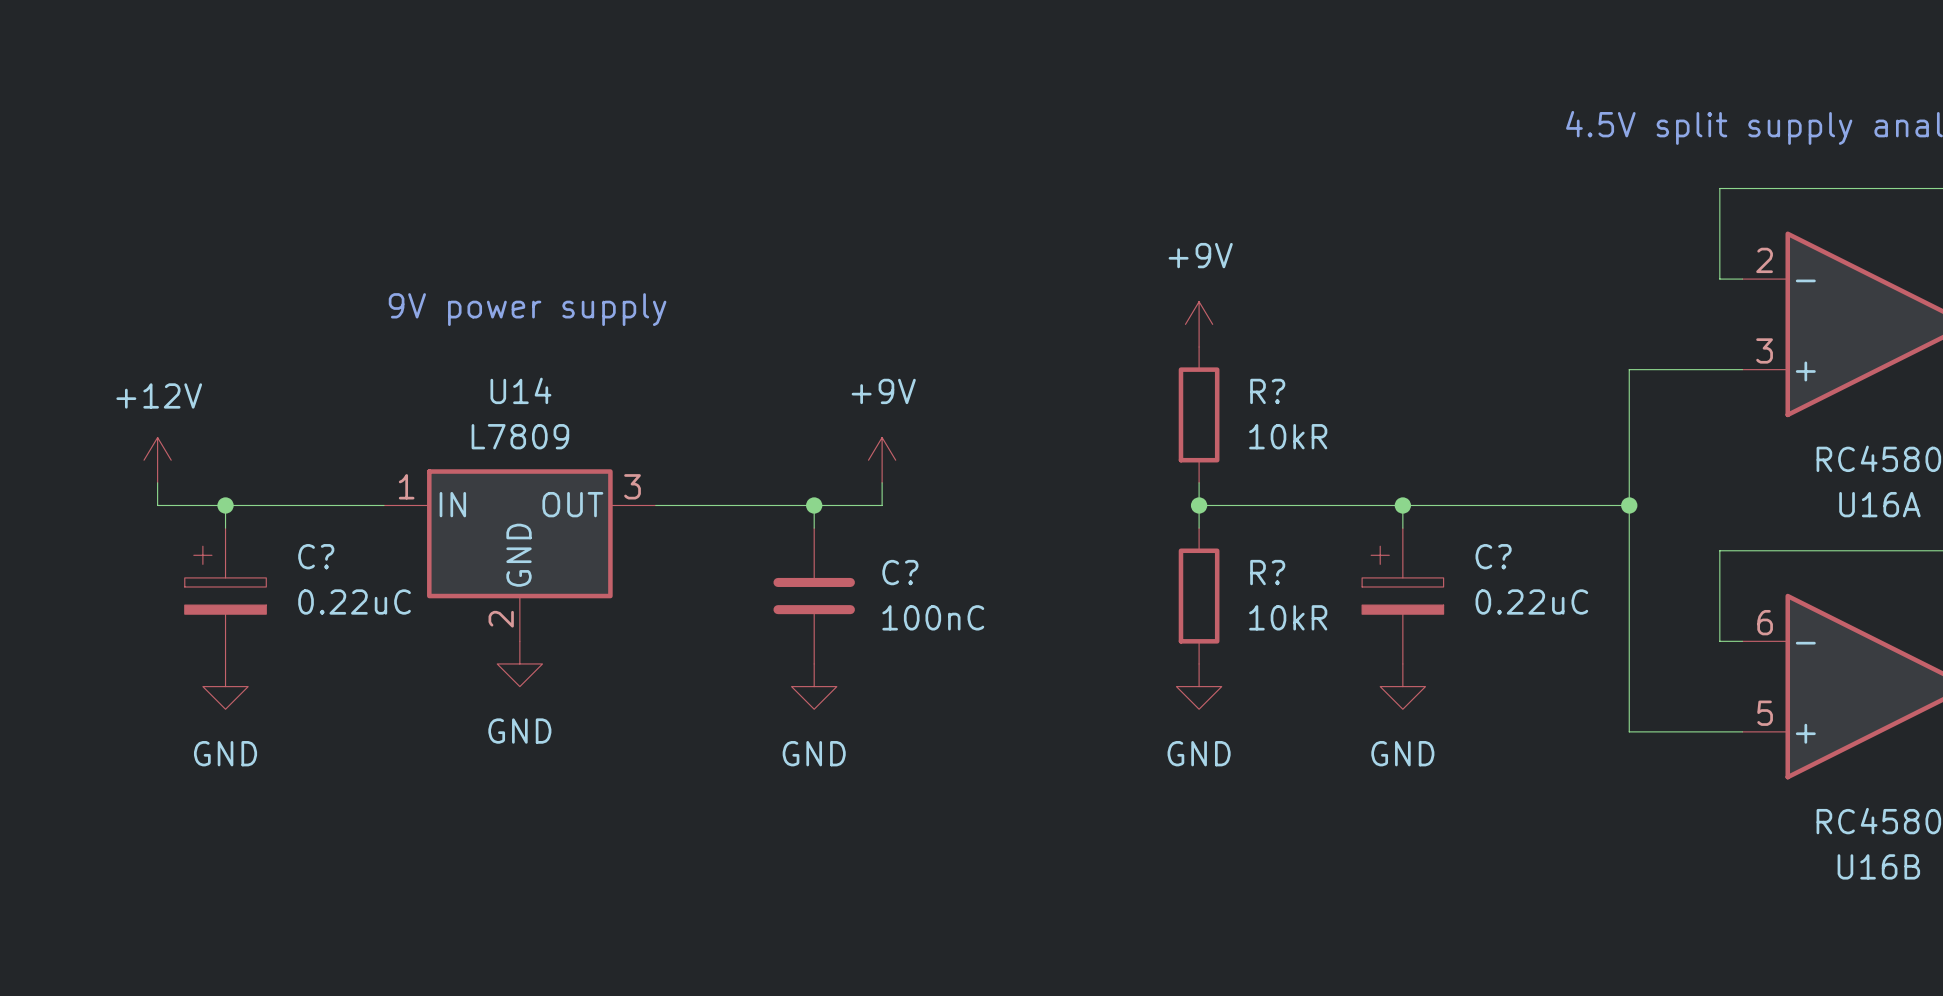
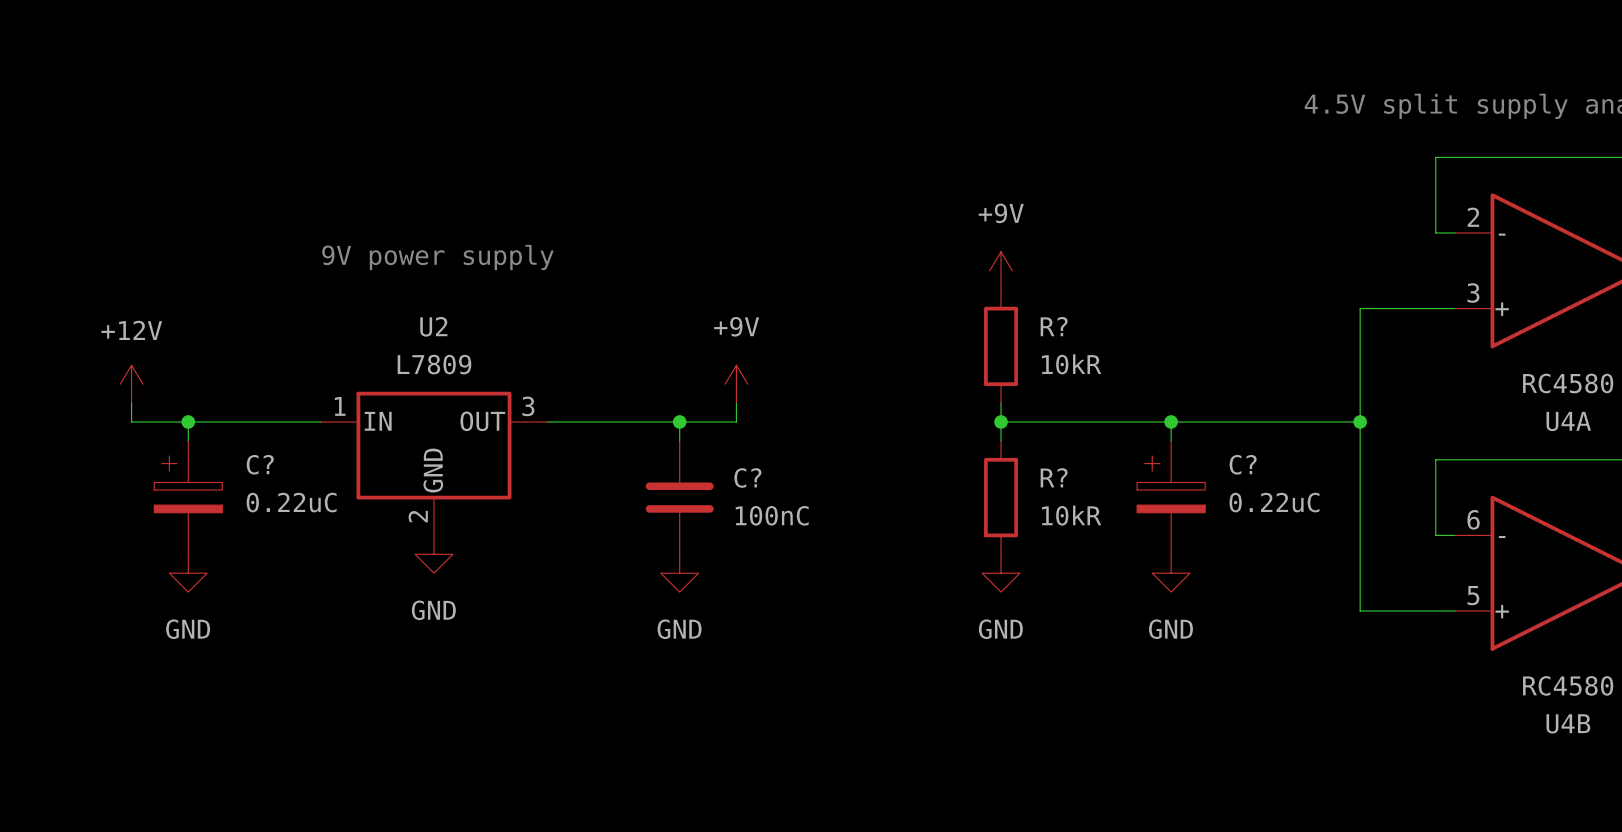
U14 name: U14 (520, 390) -> U2 (433, 326)
U16A name: U16A (1879, 504) -> U4A (1568, 421)
U16B name: U16B (1878, 866) -> U4B (1568, 723)

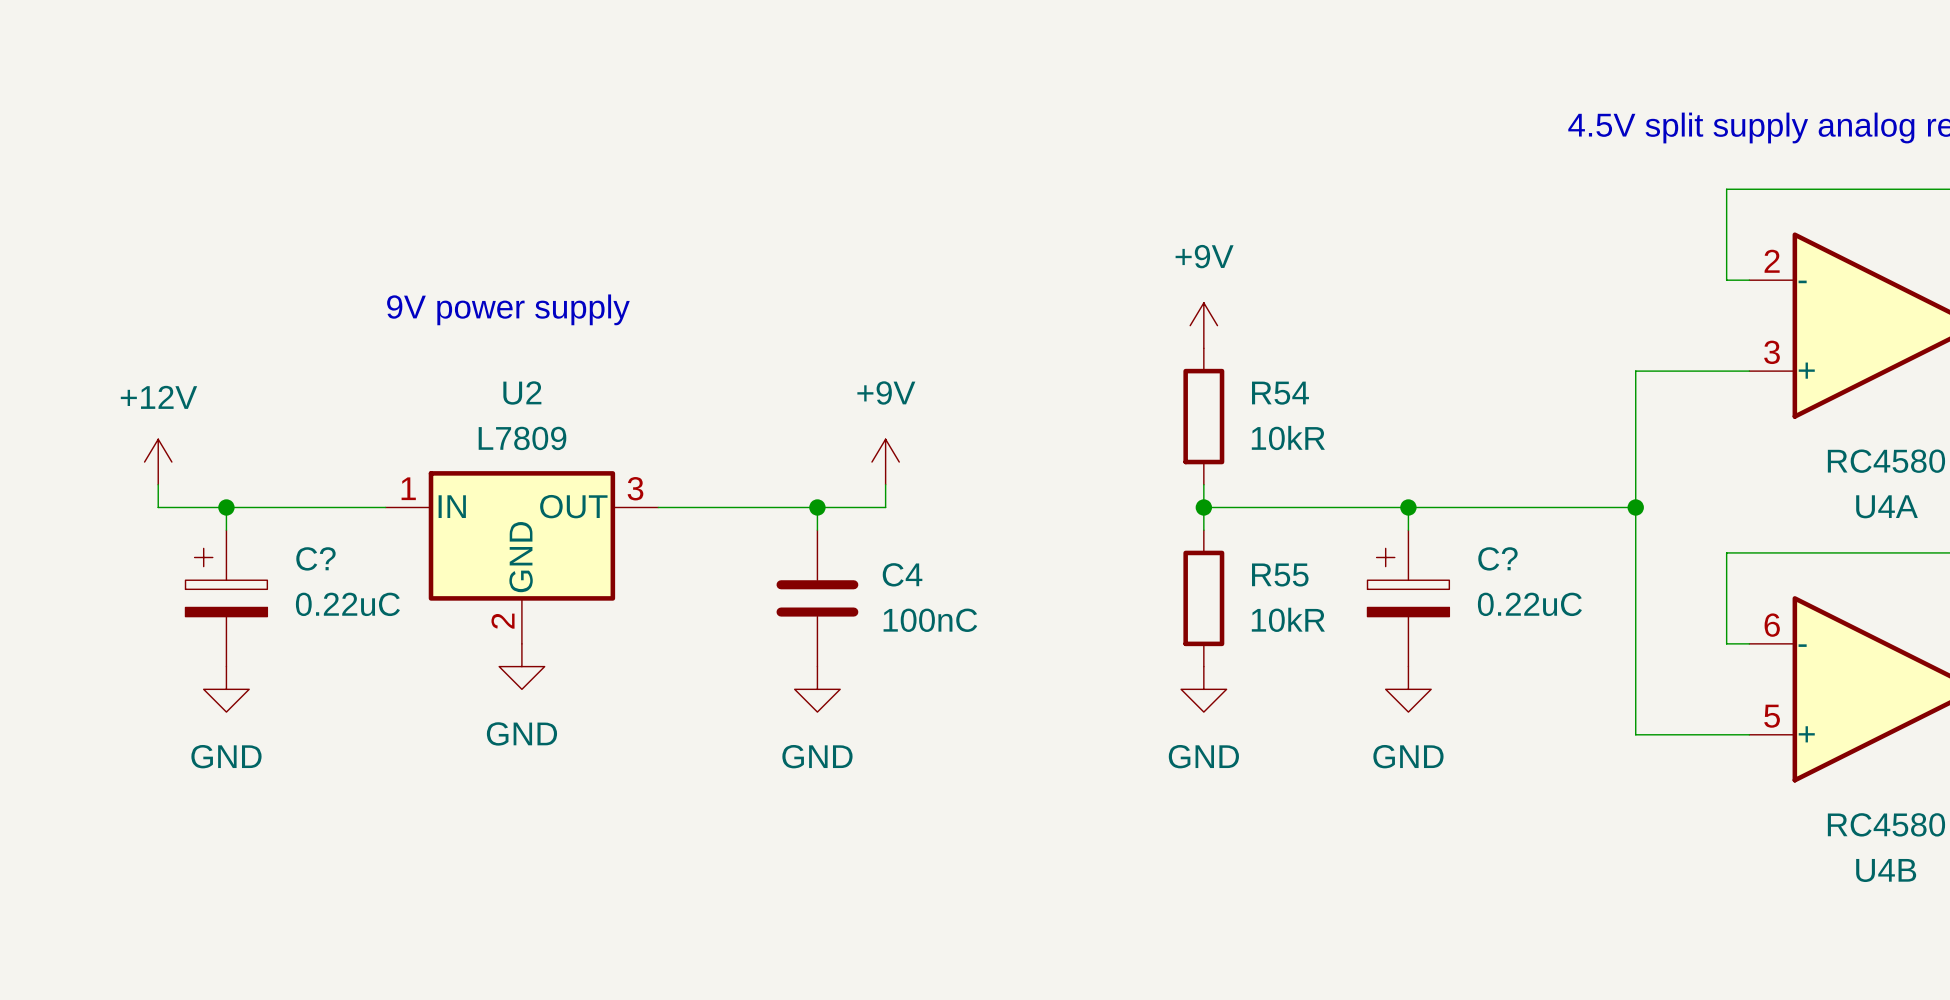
R? name: R? (1054, 326) -> R54 (1280, 393)
R? name: R? (1054, 477) -> R55 (1280, 574)
C? name: C? (747, 478) -> C4 (902, 574)

